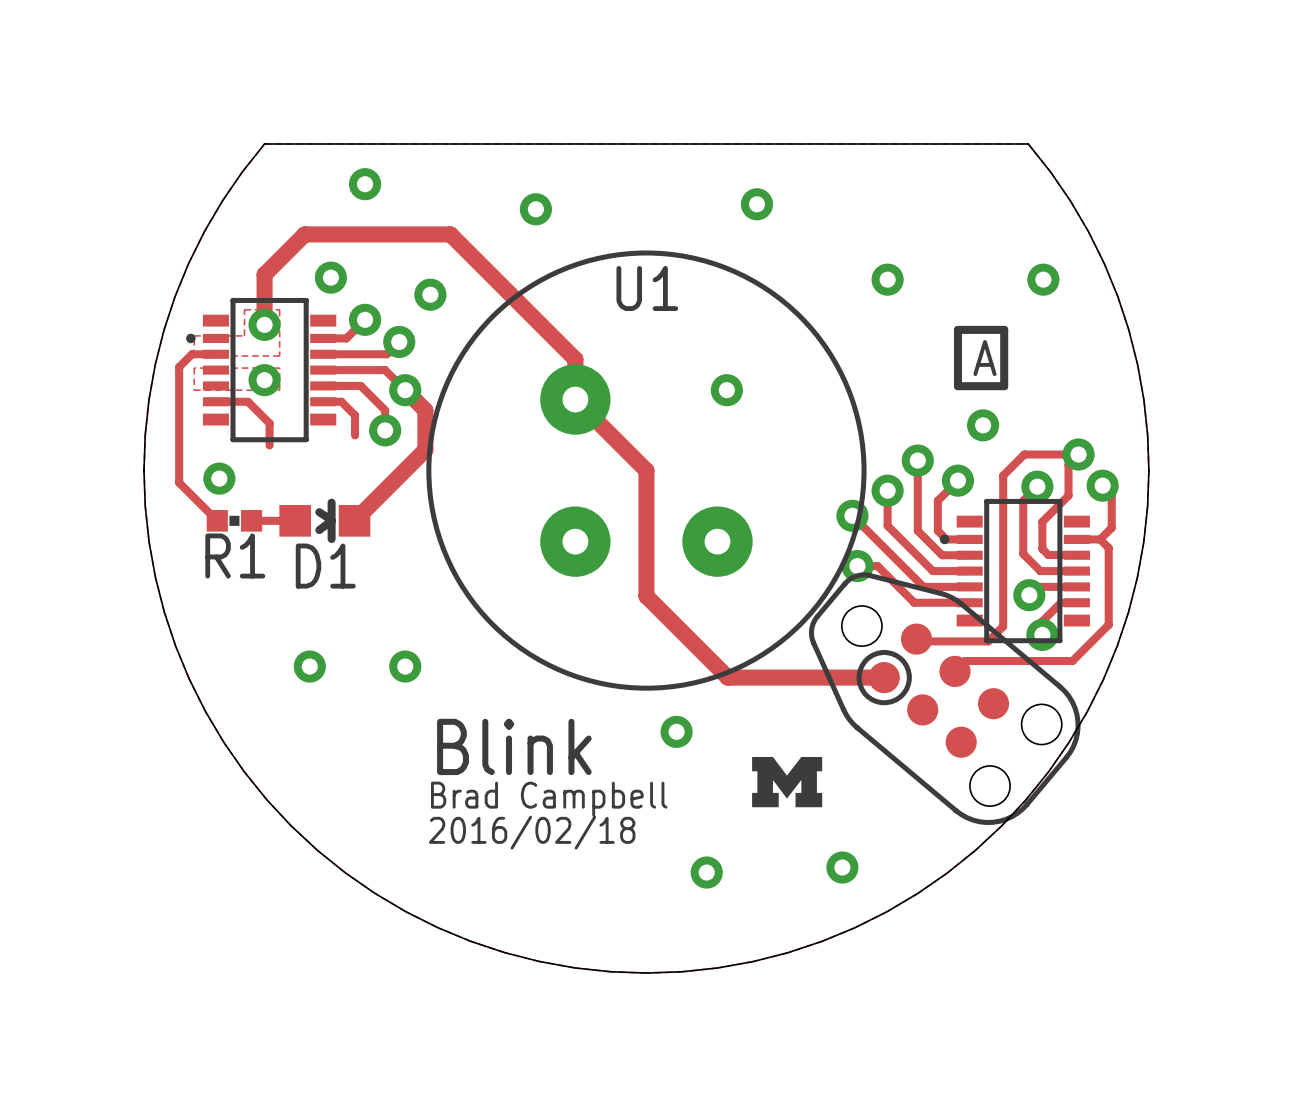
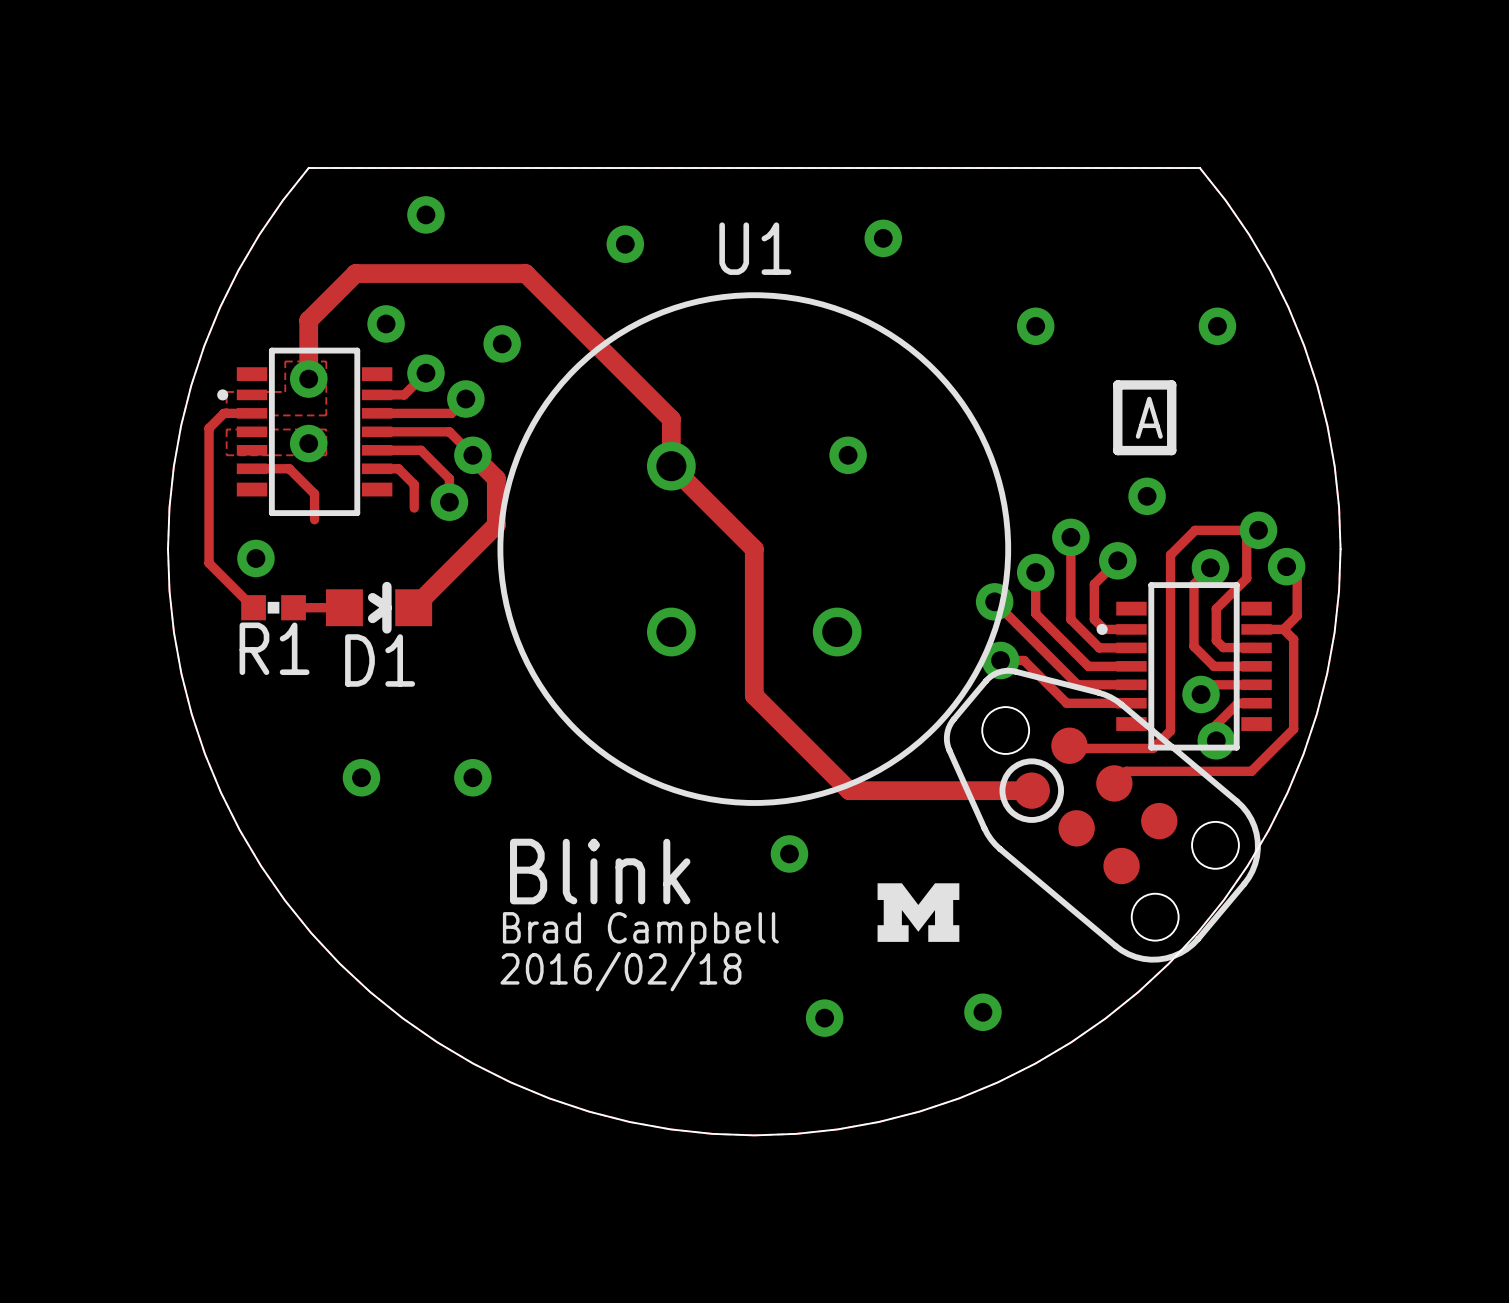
U1 footprint: [426, 250, 867, 691] -> [497, 292, 1012, 806]
U1 name position: U1 (647, 288) -> U1 (755, 248)

